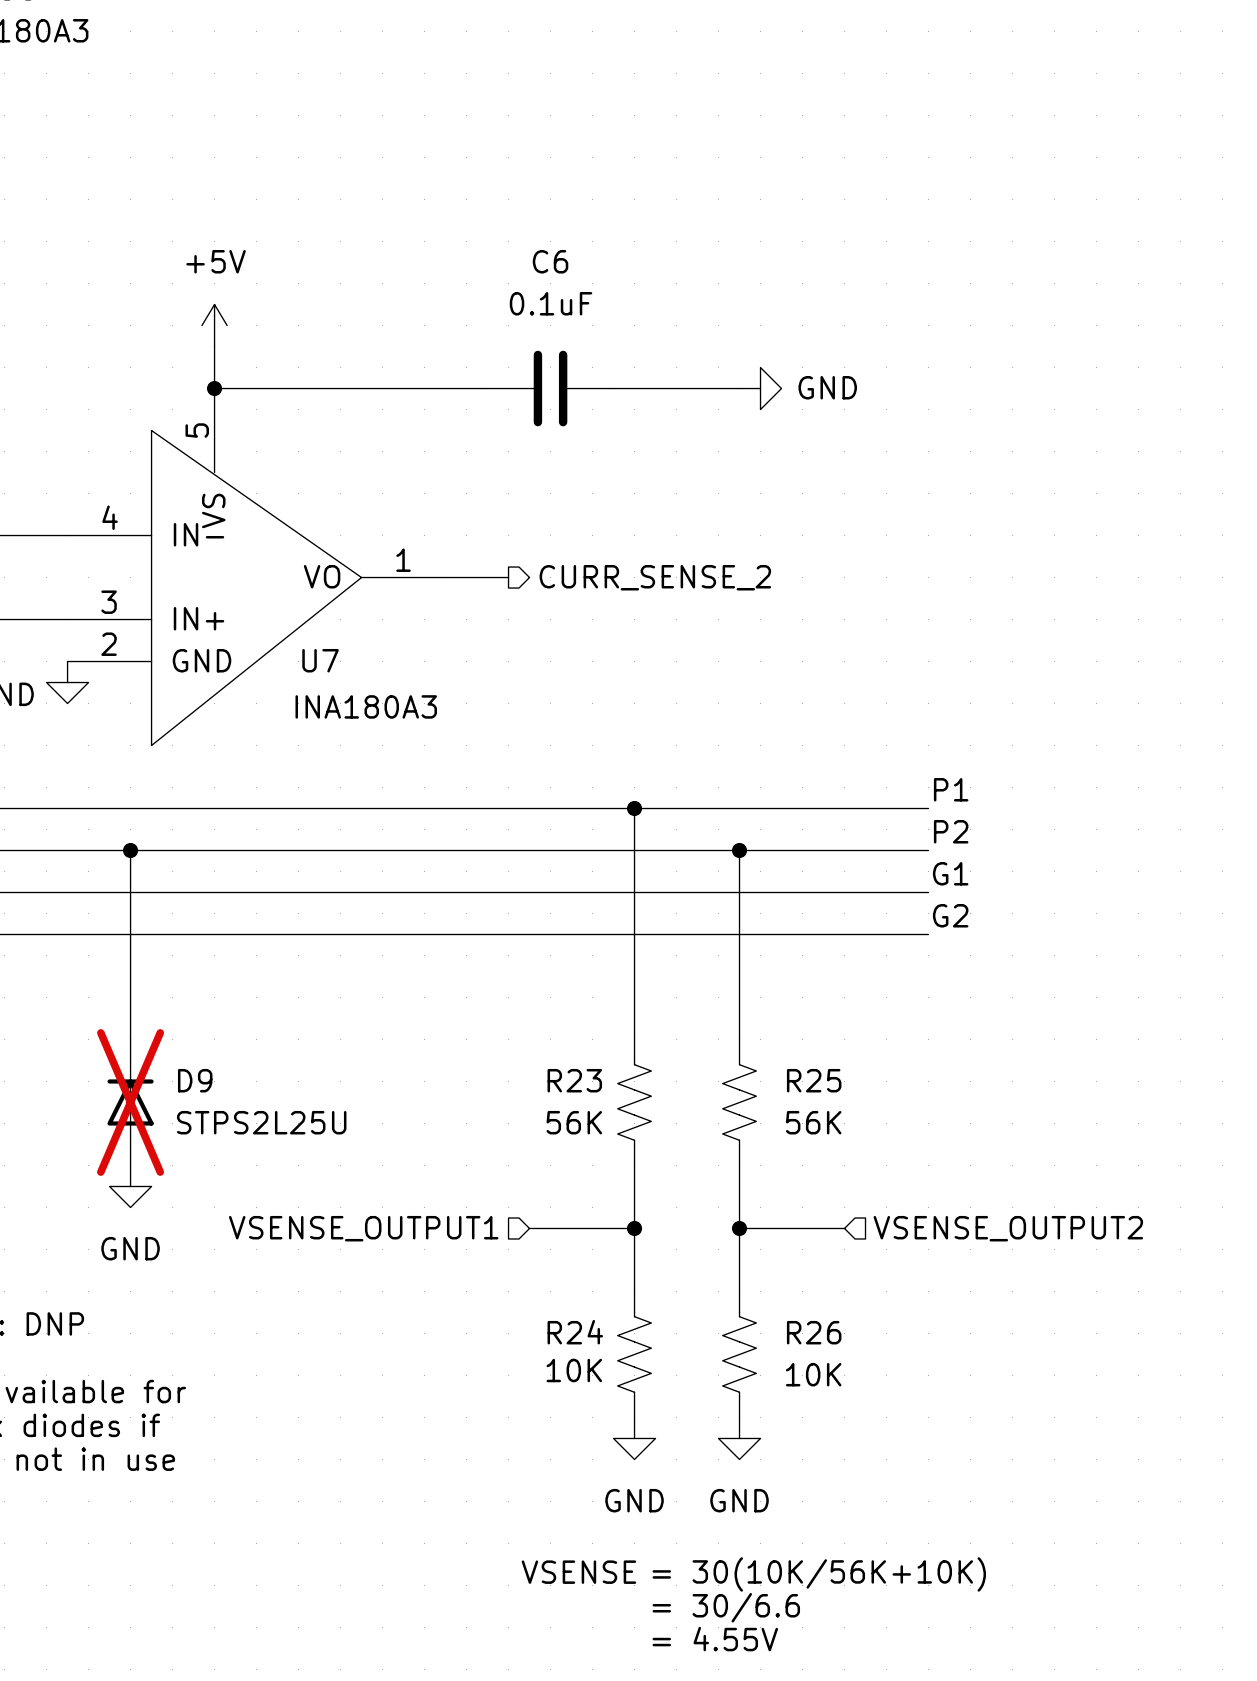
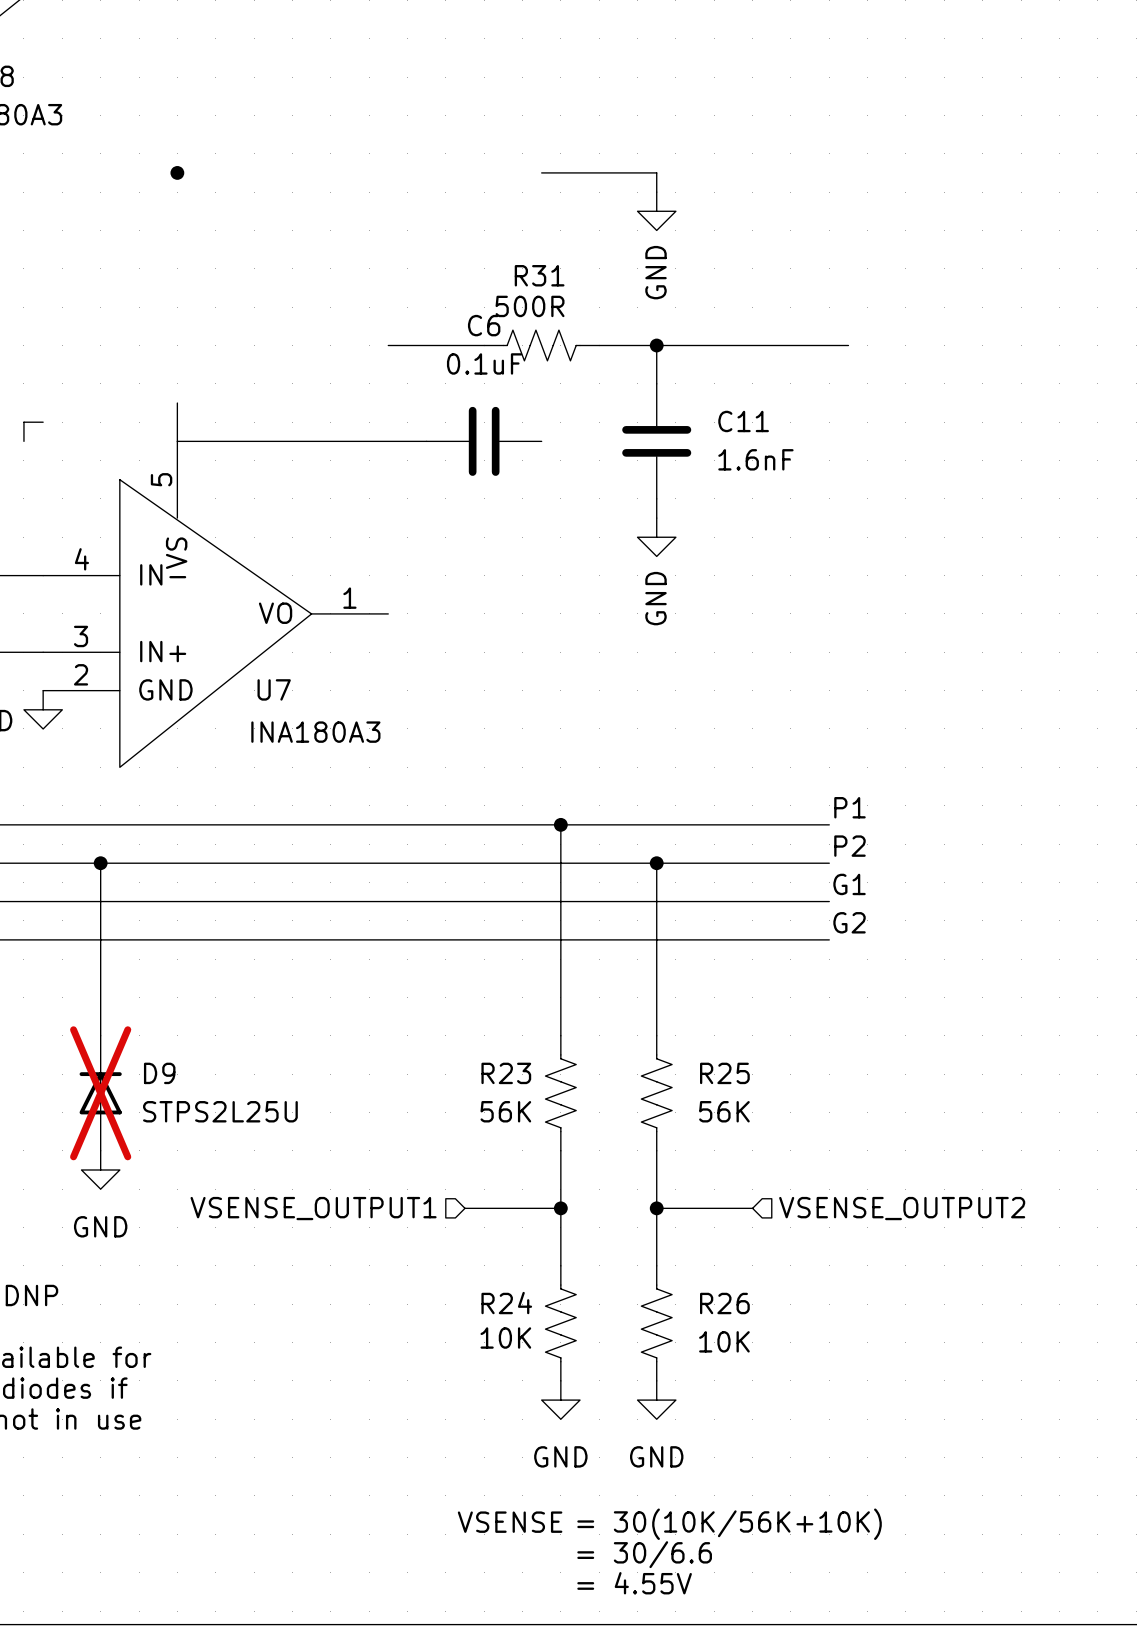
junction: none -> (177, 172)
wire: none -> (541, 172) (656, 172) (656, 192)
power symbol: none -> GND (656, 211)
wire: none -> (388, 345) (484, 345)
R31: none -> 500R (541, 345)
wire: none -> (599, 345) (848, 345)
wire: none -> (656, 345) (656, 383)
junction: none -> (656, 345)
power symbol: +5V (214, 325) -> none
wire: none -> (43, 422) (23, 422) (23, 441)
junction: (214, 388) -> none
wire: (613, 388) (739, 388) -> none
C11: none -> 1.6nF (656, 441)
power symbol rotation: 0° (760, 388) -> 90° clockwise (656, 537)
power symbol position: GND (760, 388) -> GND (656, 537)
wire: none -> (656, 498) (656, 518)
wire: (445, 577) (508, 577) -> none
hierarchical label: CURR_SENSE_2 (655, 577) -> none

